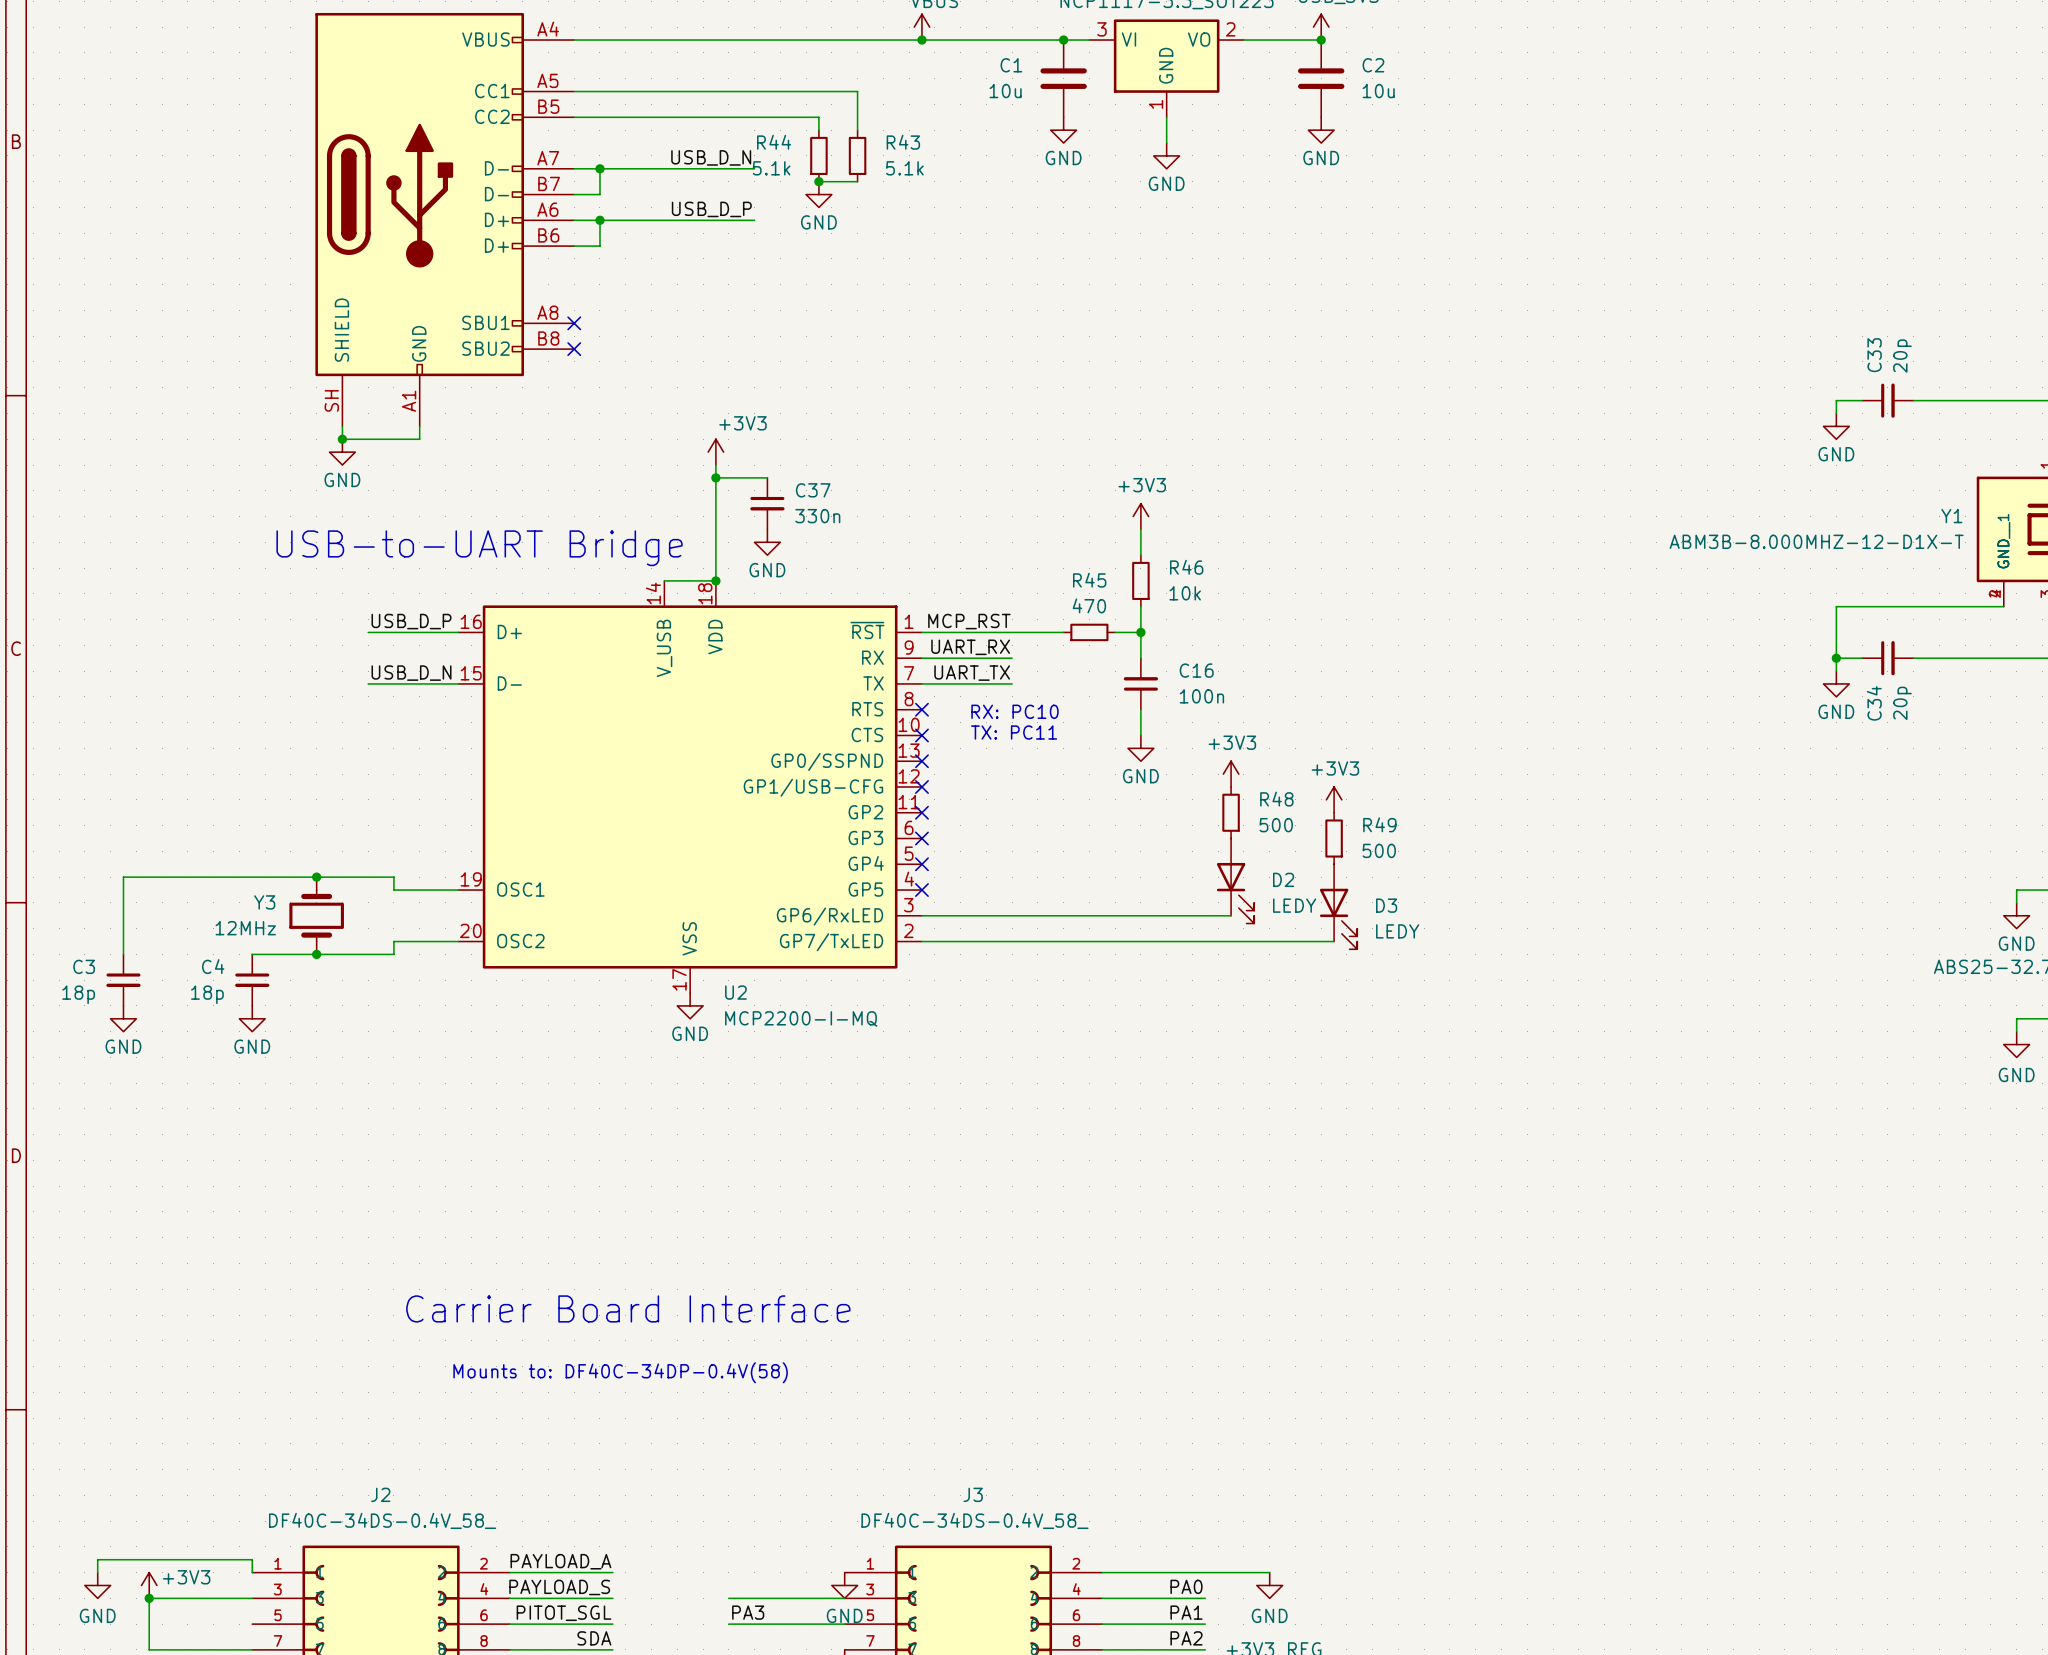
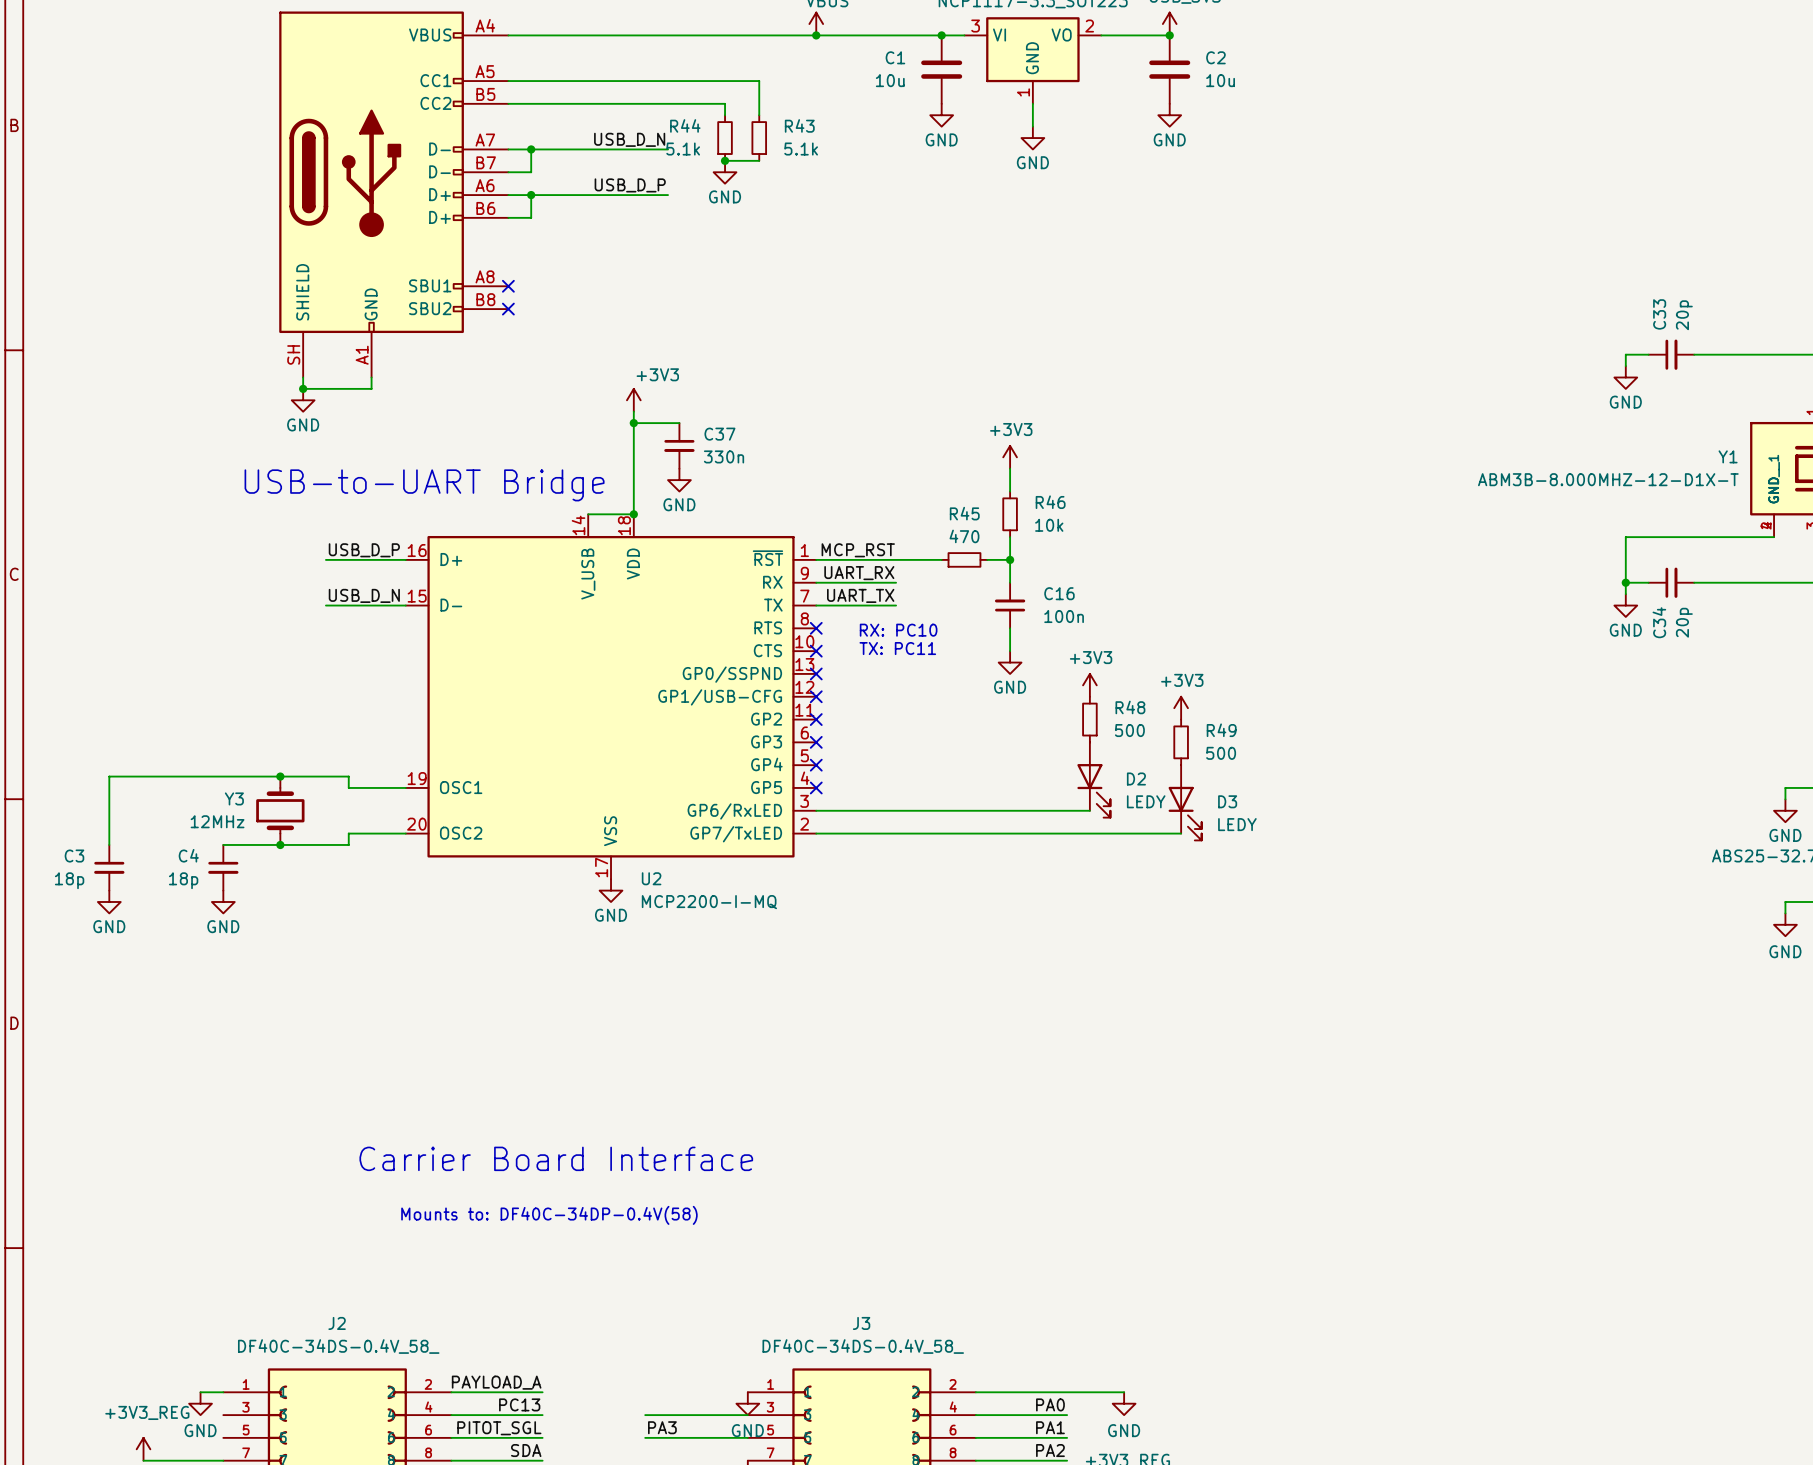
wire: (97, 1572) (97, 1559) (252, 1559) (252, 1572) -> (200, 1392) (223, 1392)
power symbol position: GND (97, 1585) -> GND (200, 1403)
power symbol: +3V3 (149, 1585) -> none
label: PAYLOAD_S (559, 1587) -> PC13 (519, 1404)
junction: (149, 1598) -> none
wire: (252, 1598) (149, 1598) (149, 1649) (162, 1649) -> none
power symbol: none -> +3V3_REG (143, 1449)

